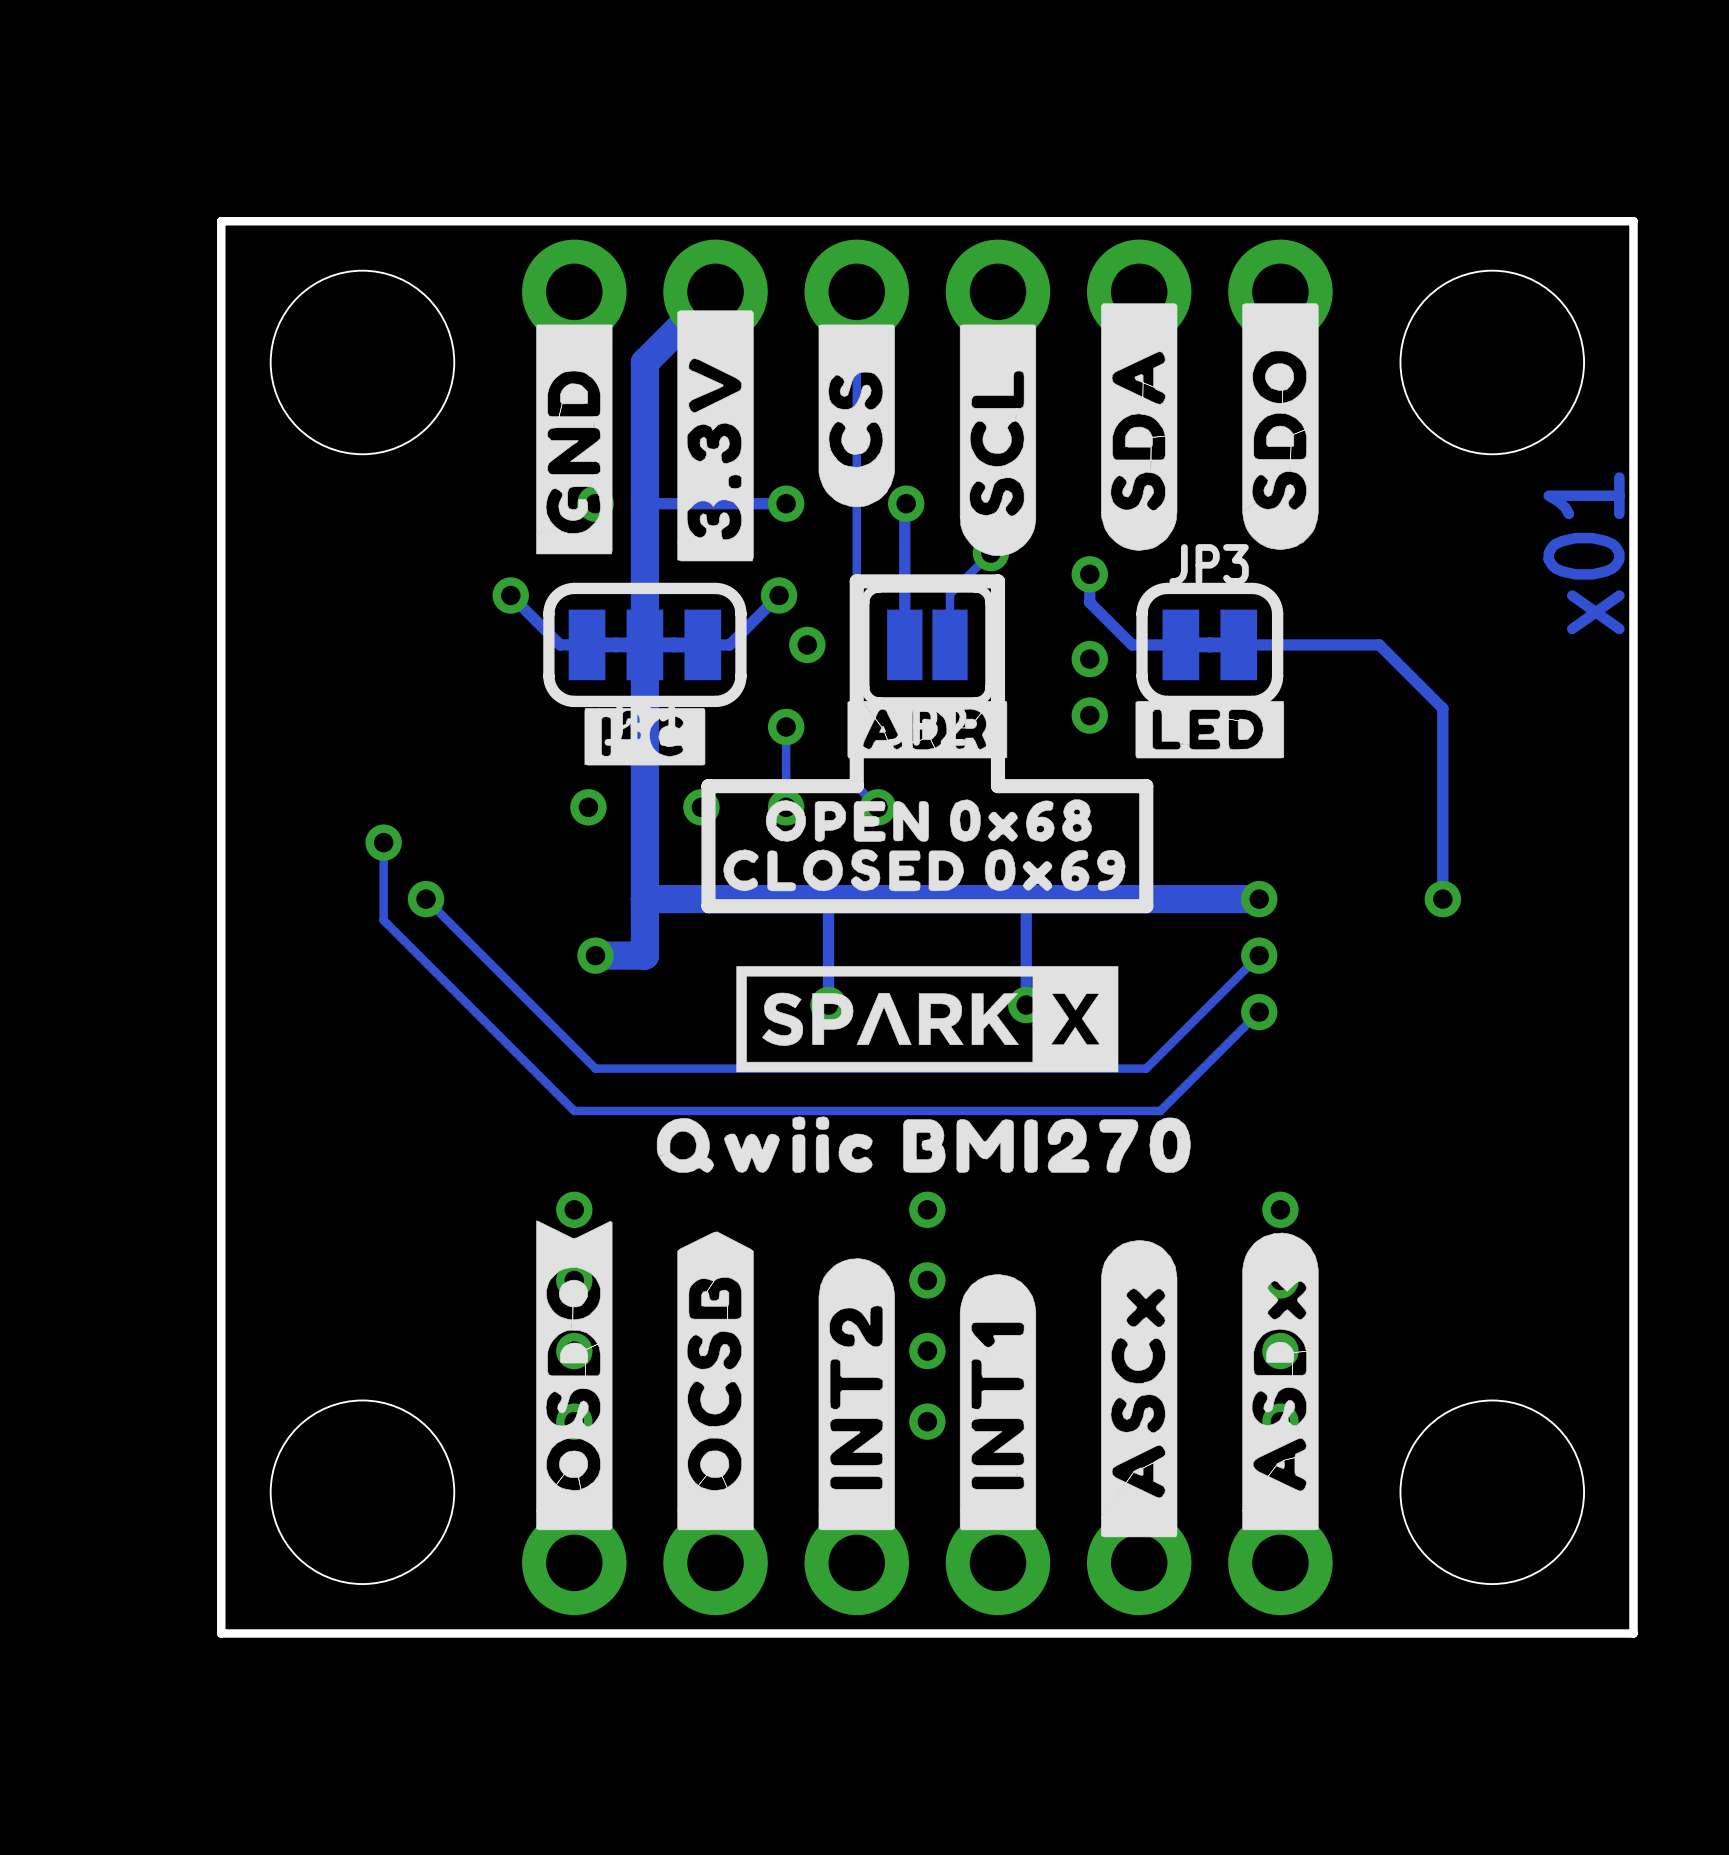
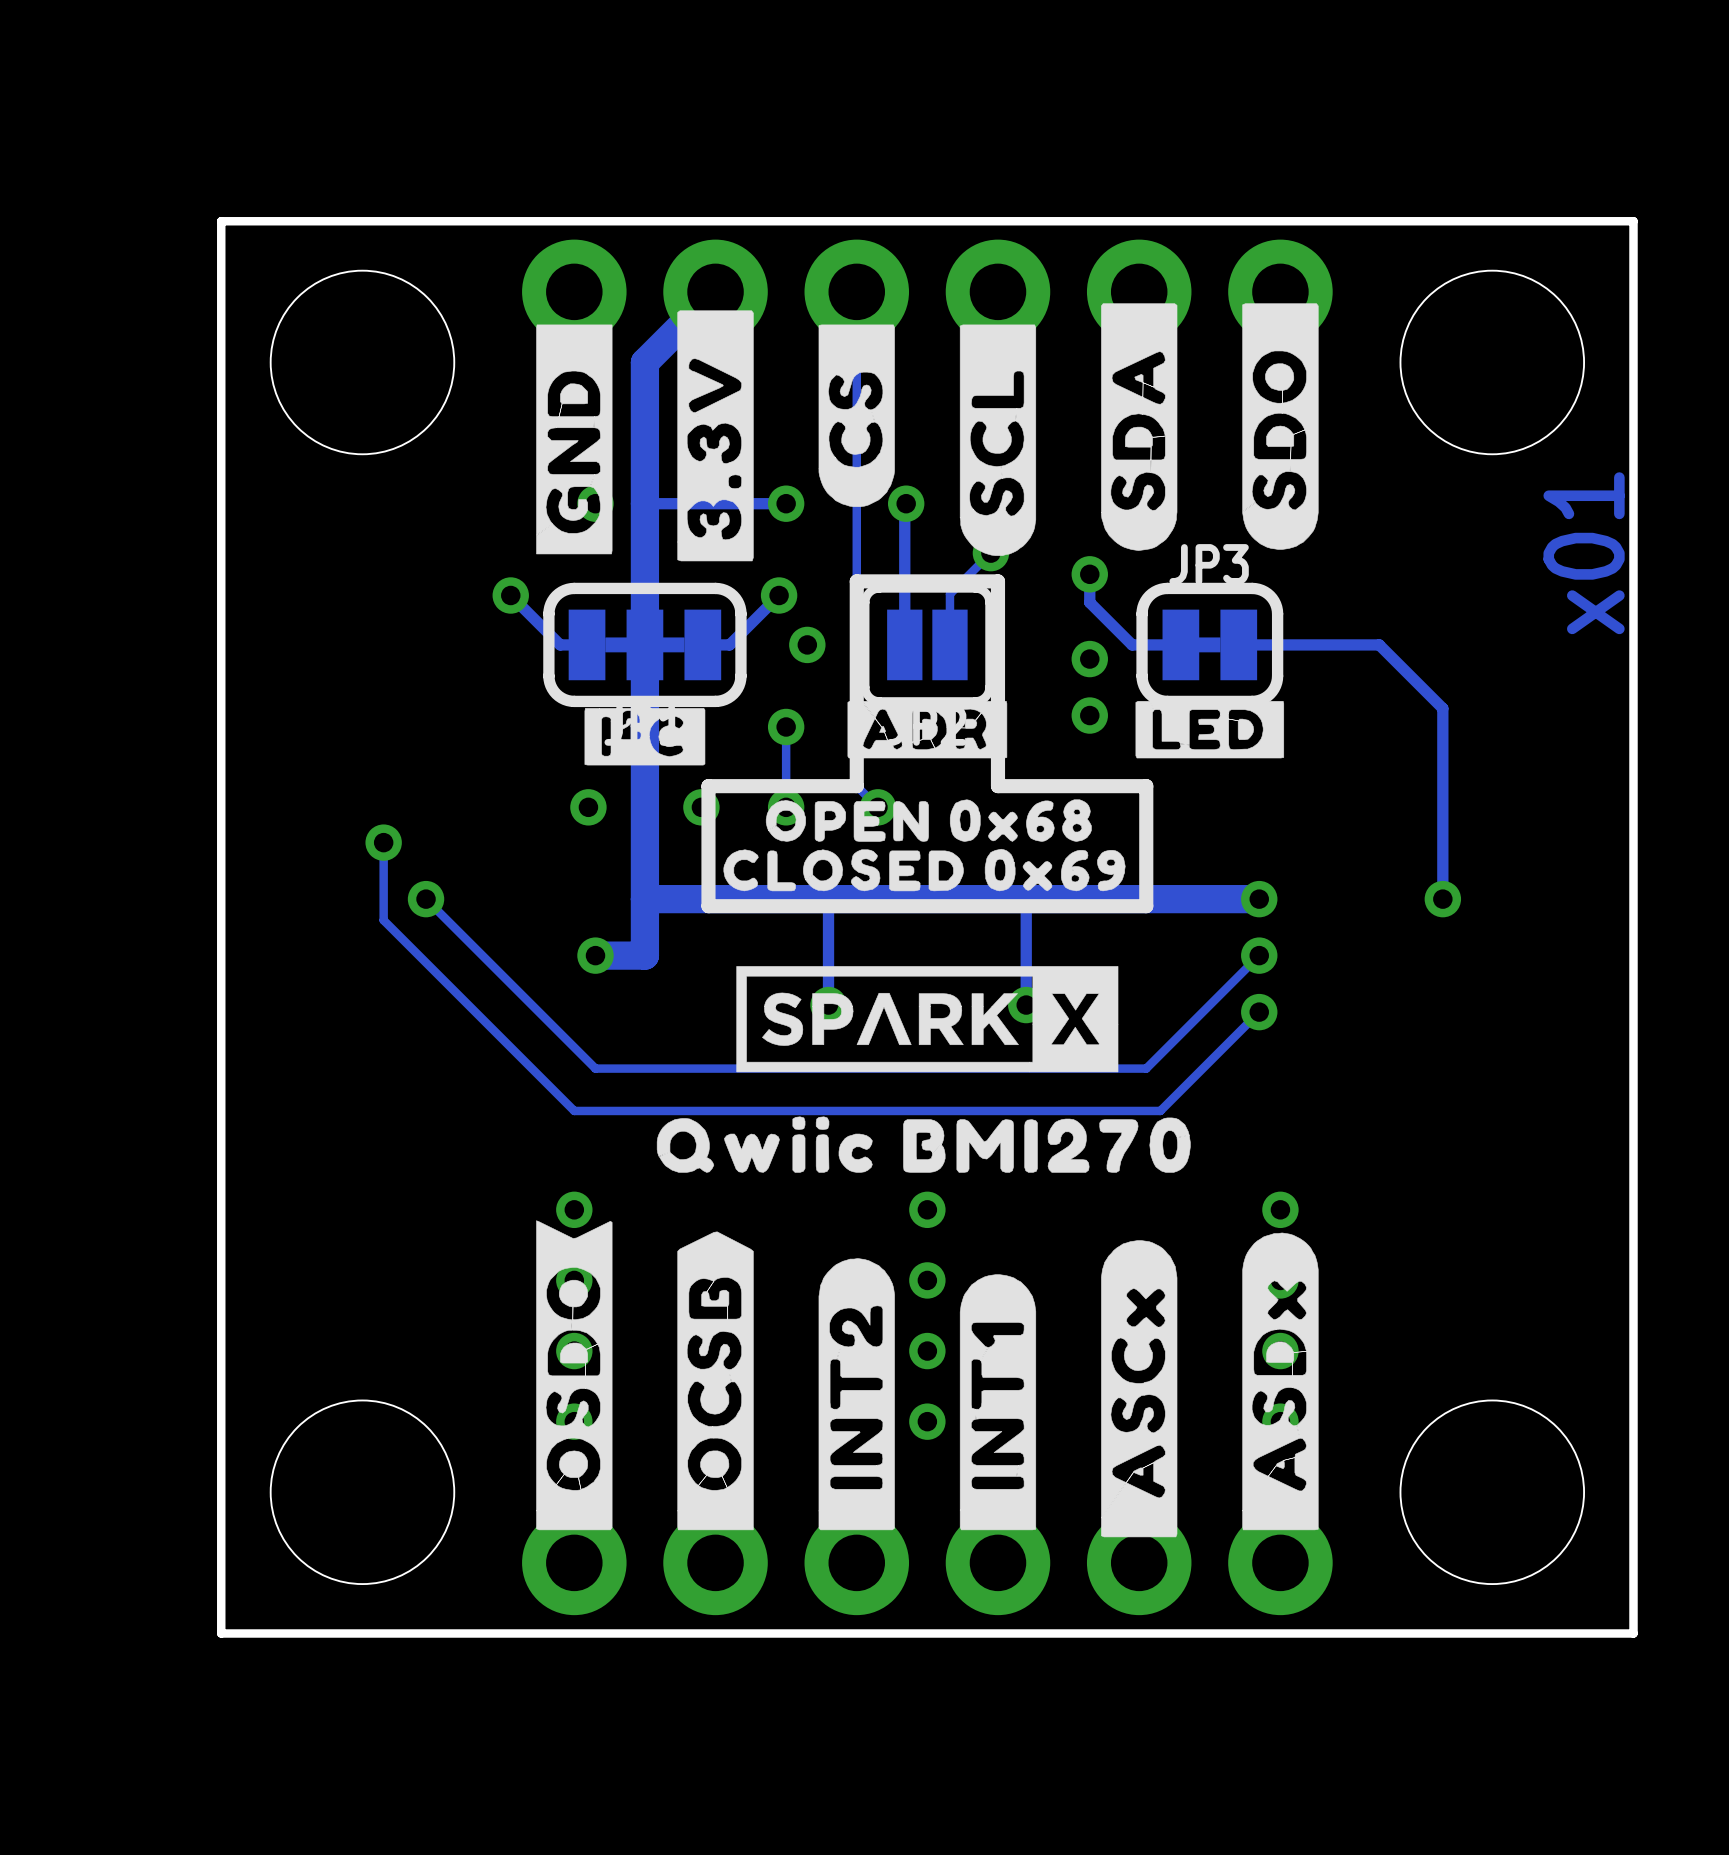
part footprint: [543, 582, 747, 708] -> [543, 582, 747, 708]
JP3 footprint: [1136, 582, 1284, 708] -> [1136, 582, 1284, 708]

